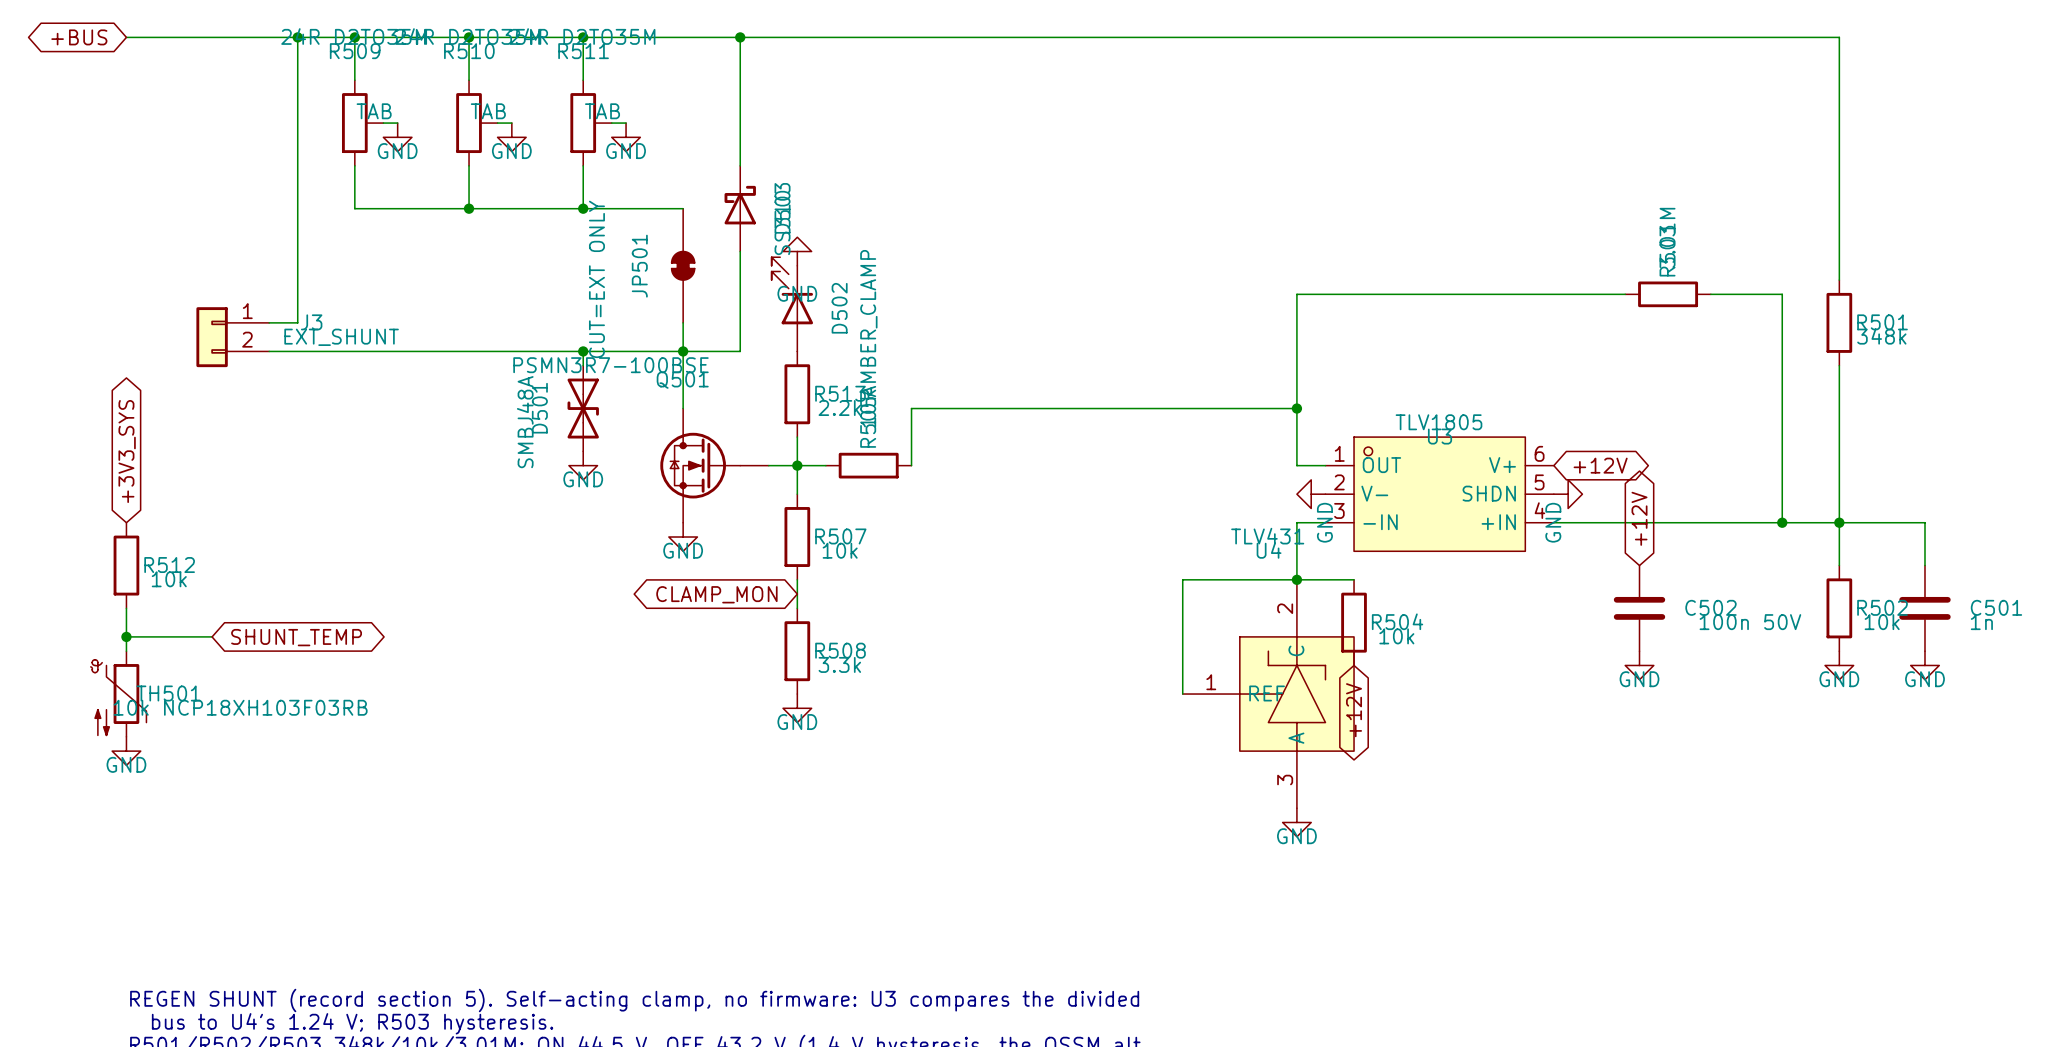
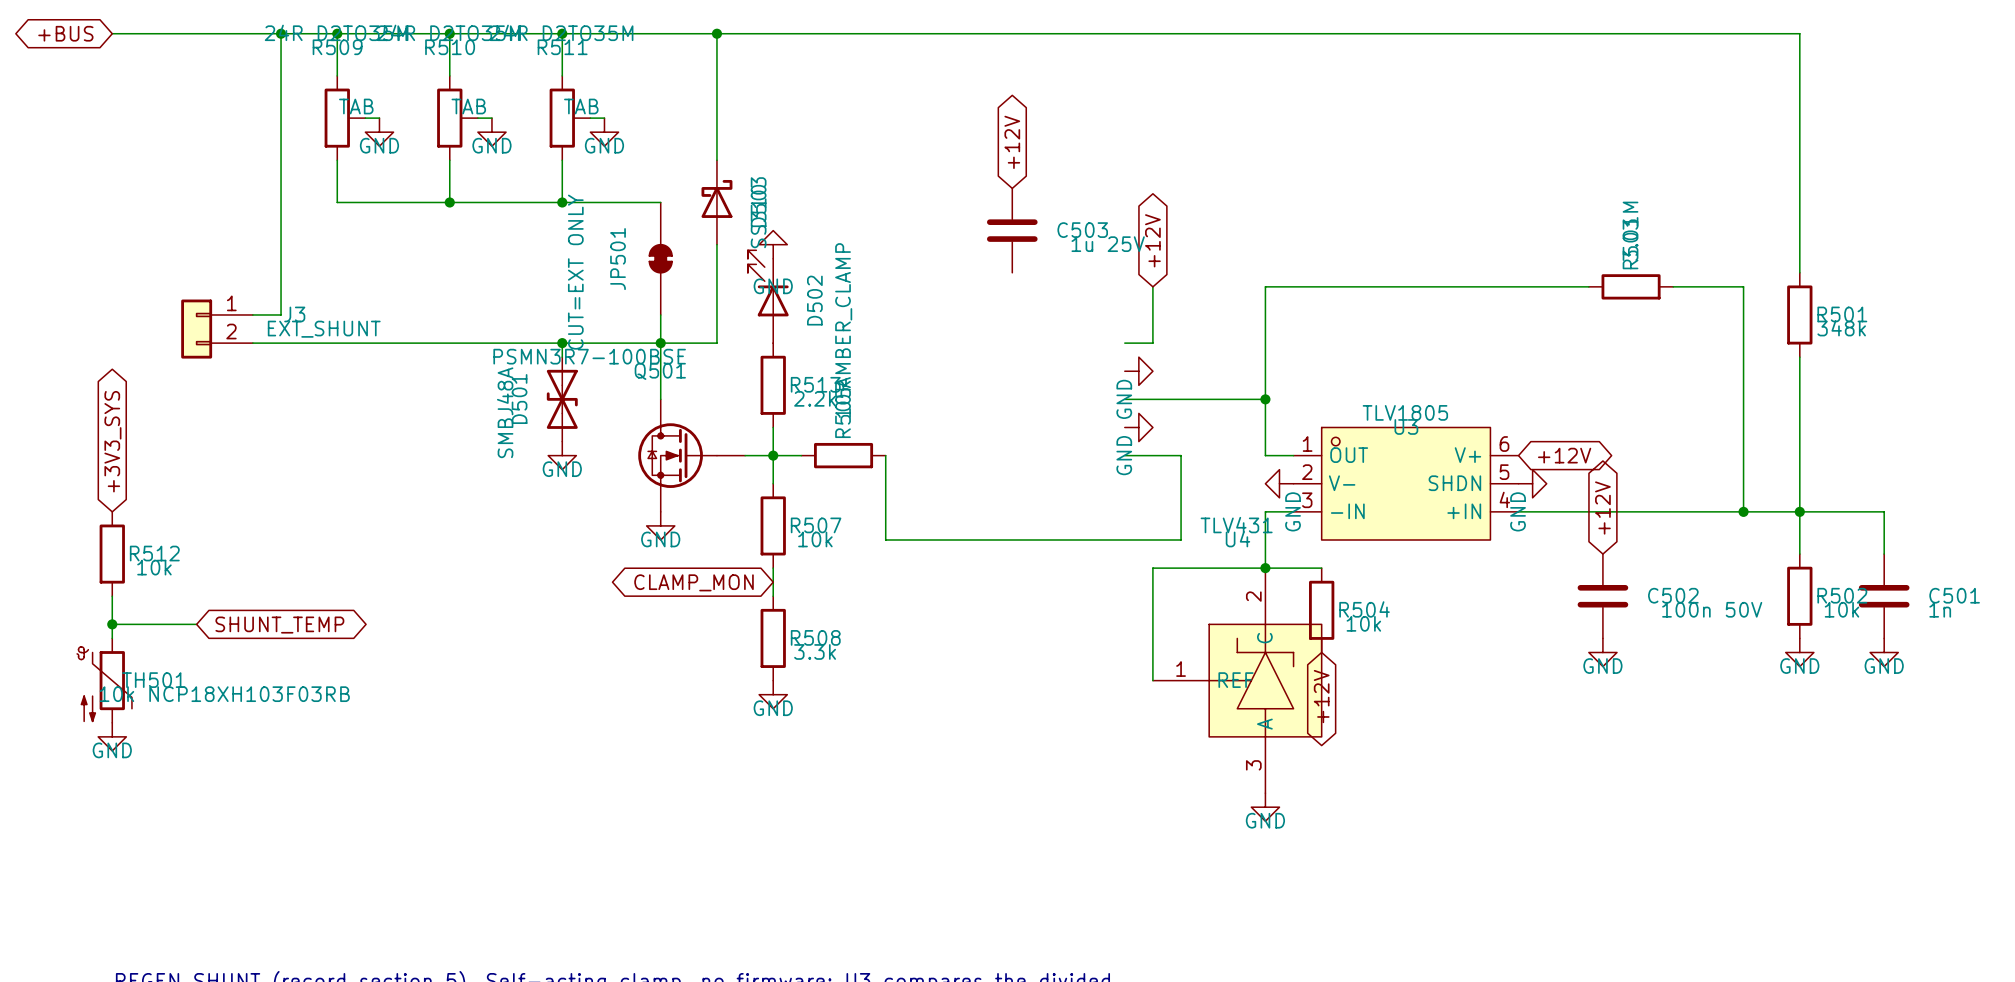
global label: none -> +12V (1012, 142)
C503: none -> 1u 25V (1012, 230)
global label: none -> +12V (1152, 240)
wire: none -> (1152, 286) (1152, 343) (1124, 343)
power symbol: none -> GND (1138, 371)
wire: (1154, 408) (911, 408) (911, 465) -> (1124, 455) (1181, 455) (1181, 539) (885, 539) (885, 455)
power symbol: none -> GND (1138, 427)

